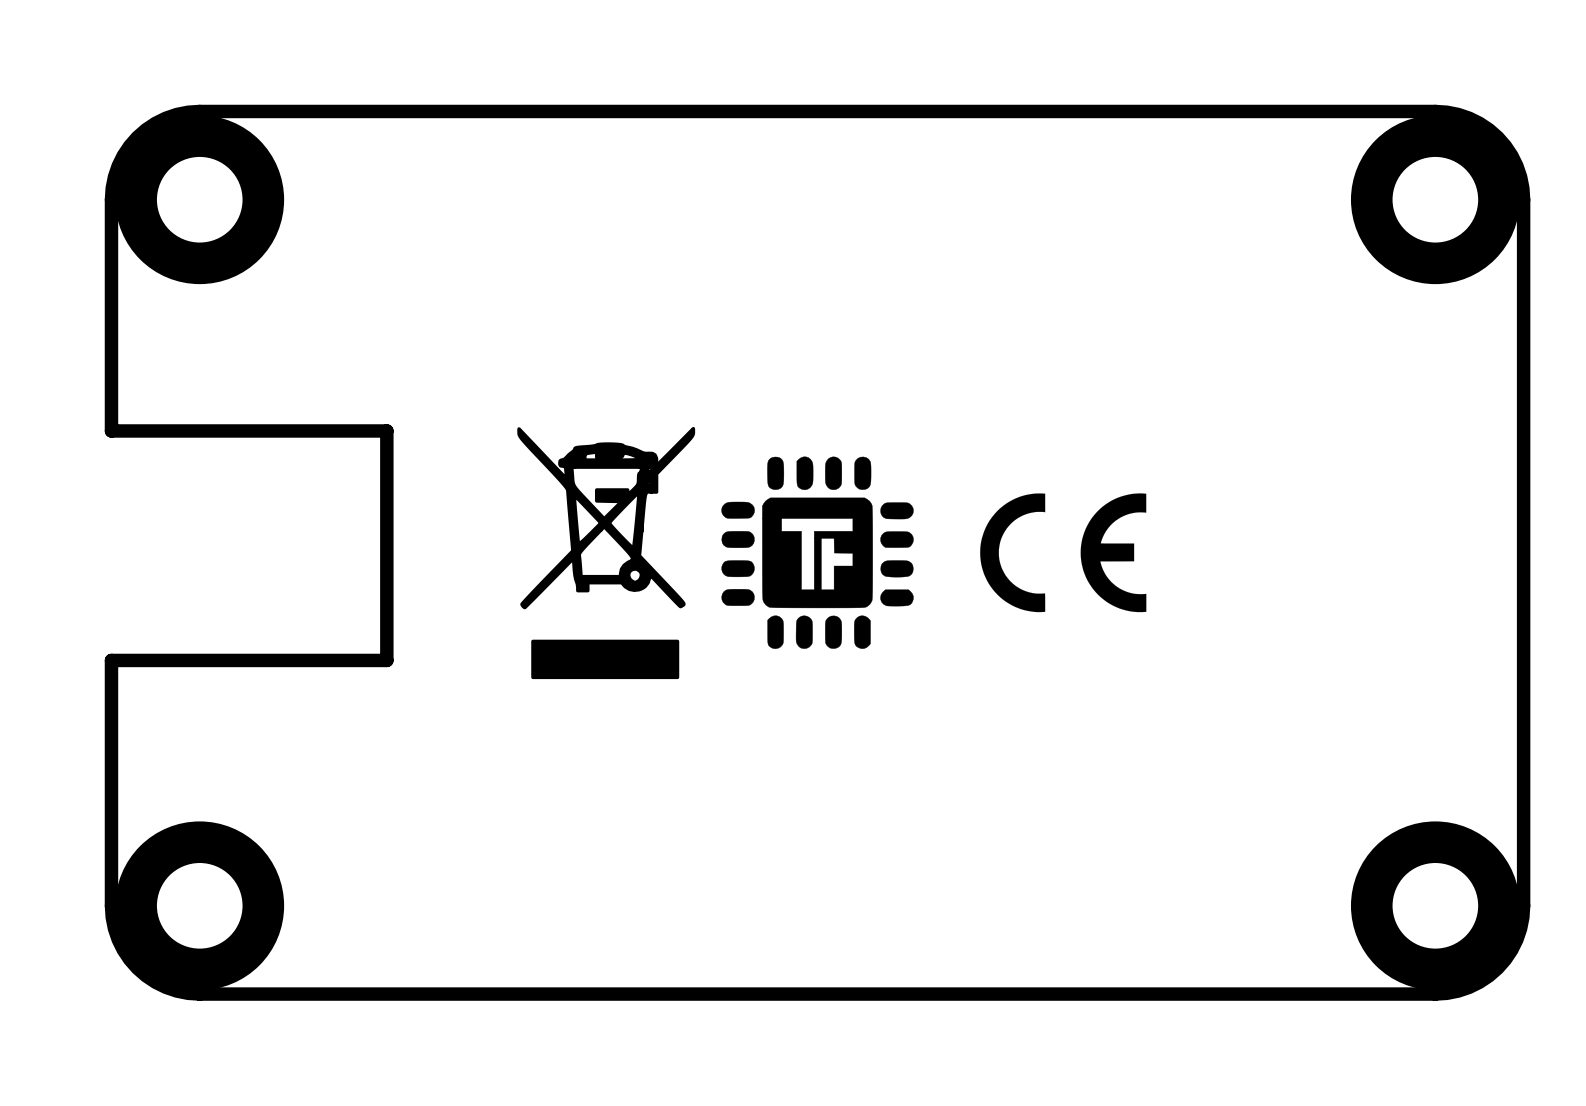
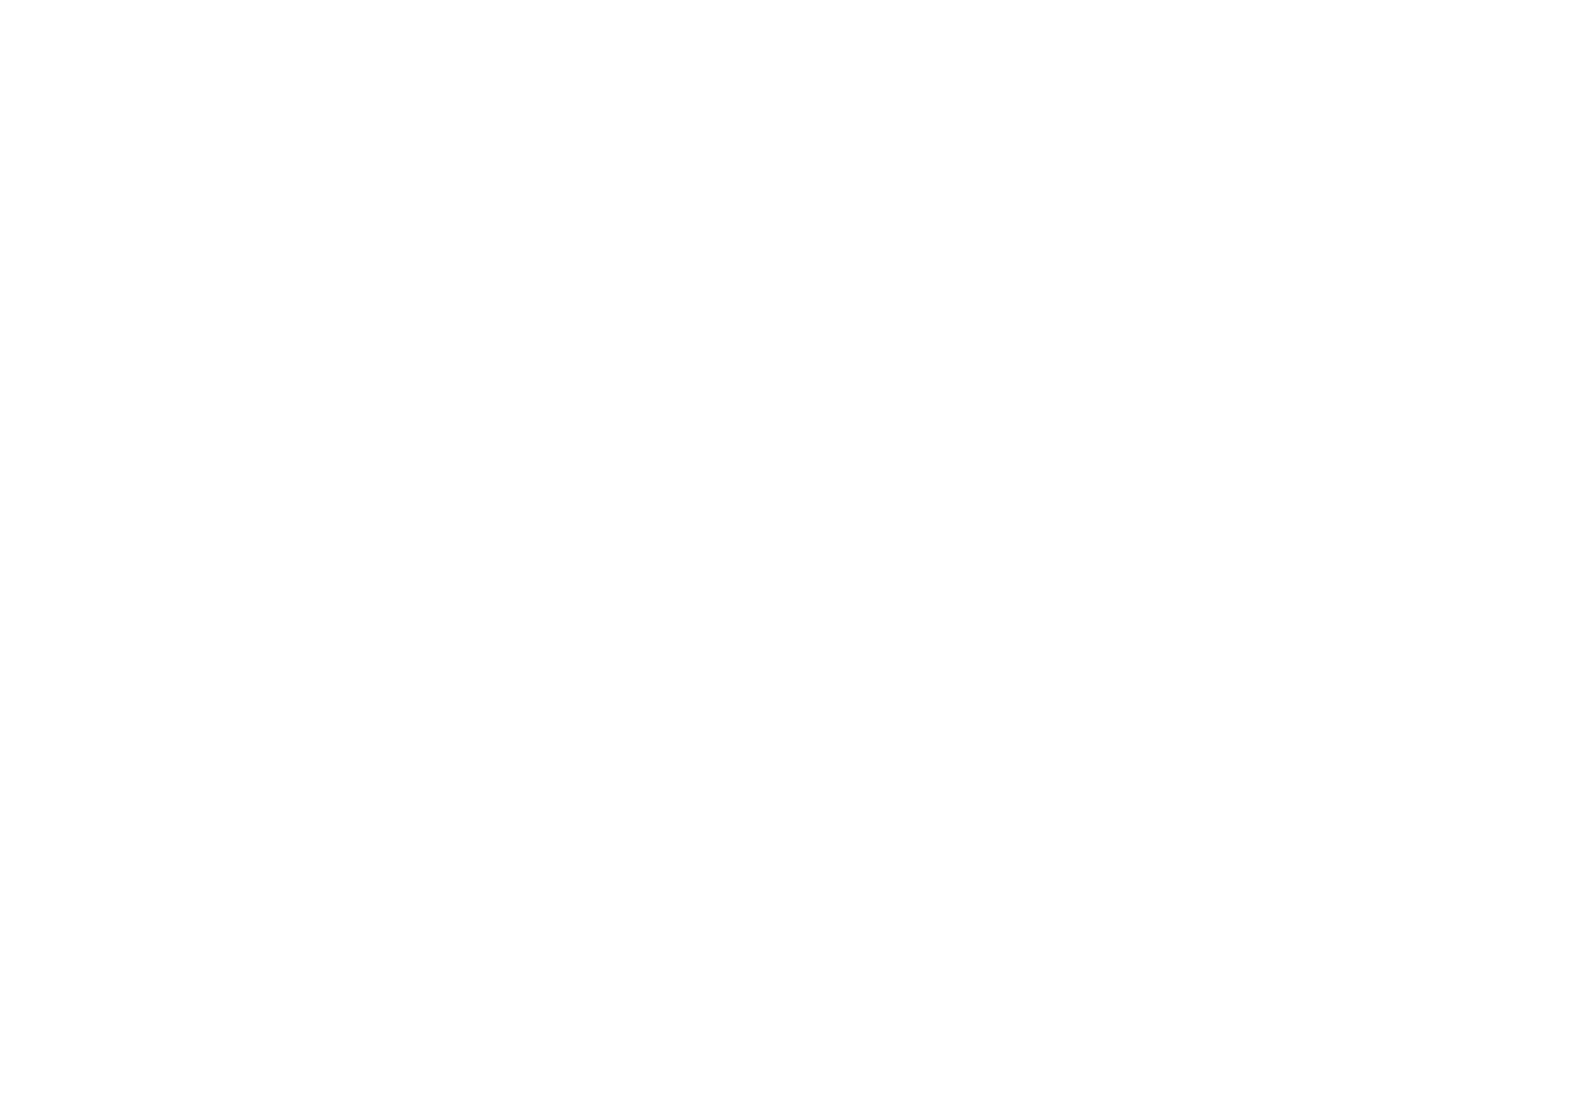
board edge: (1435, 111) (199, 111) (176, 114) (155, 123) (137, 137) (129, 146) (118, 165) (112, 188) (111, 430) (386, 430) (386, 660) (111, 660) (111, 905) (114, 928) (123, 949) (137, 968) (155, 982) (176, 991) (199, 994) (1435, 994) (1458, 991) (1479, 982) (1497, 968) (1511, 949) (1520, 928) (1523, 905) (1523, 199) (1520, 176) (1516, 165) (1511, 155) (1497, 137) (1479, 123) (1469, 118) (1458, 114) (1435, 111) -> none
part: (199, 199) -> none
part: (1435, 199) -> none
drawing: [517, 426, 914, 680] -> none
drawing: [980, 493, 1147, 613] -> none
part: (199, 905) -> none
part: (1435, 905) -> none

